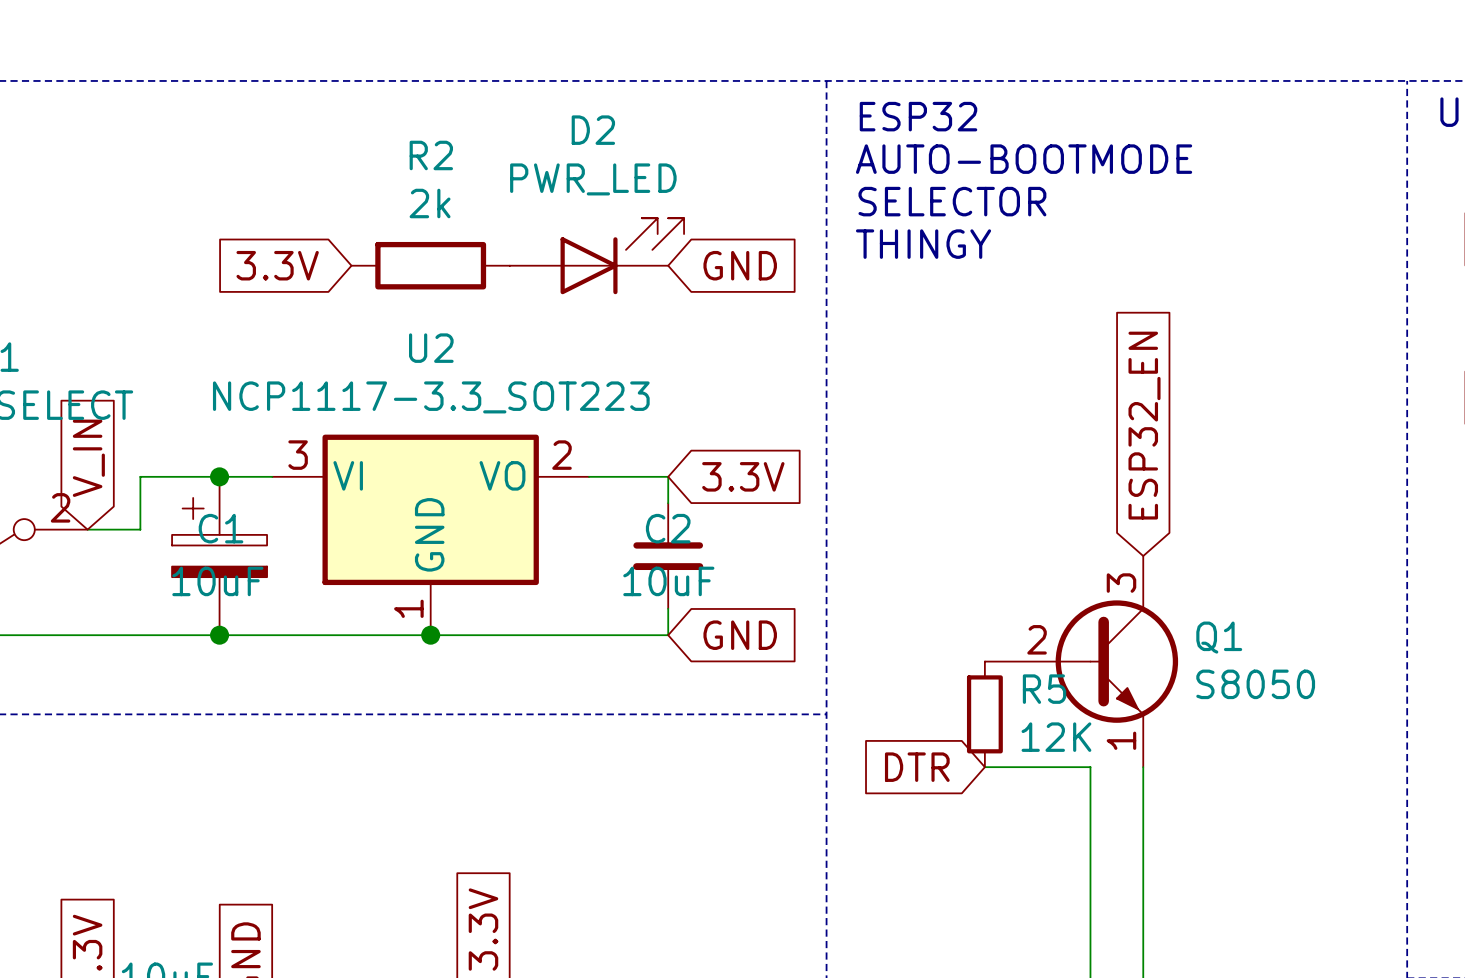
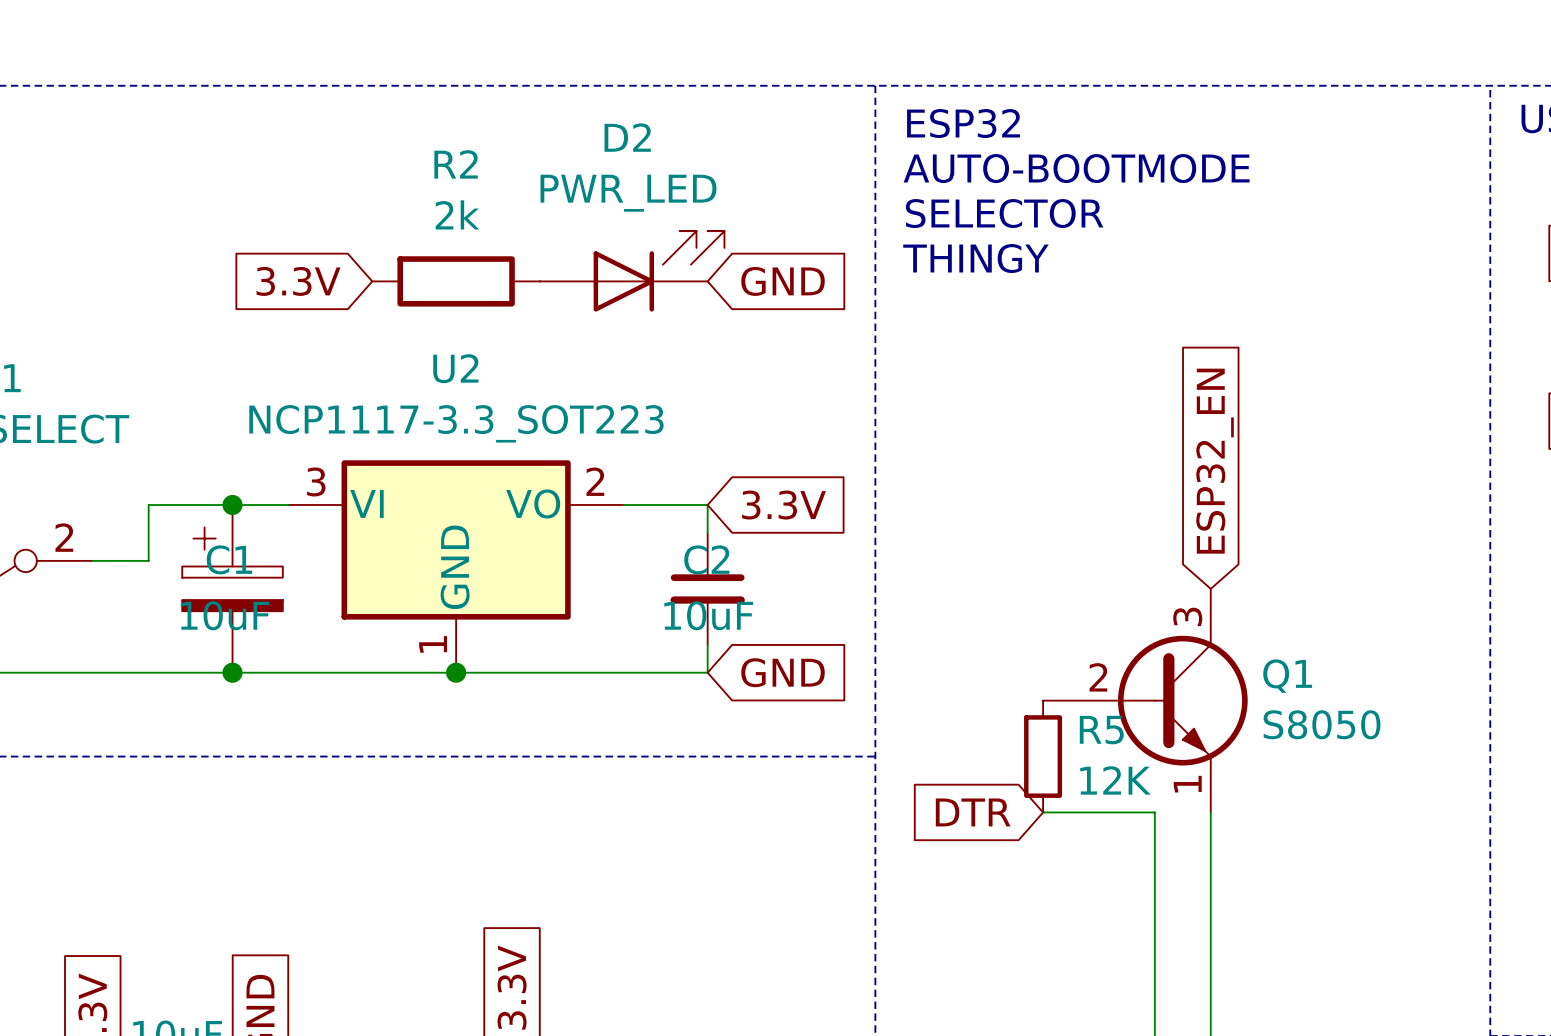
global label: V_IN (88, 458) -> none

